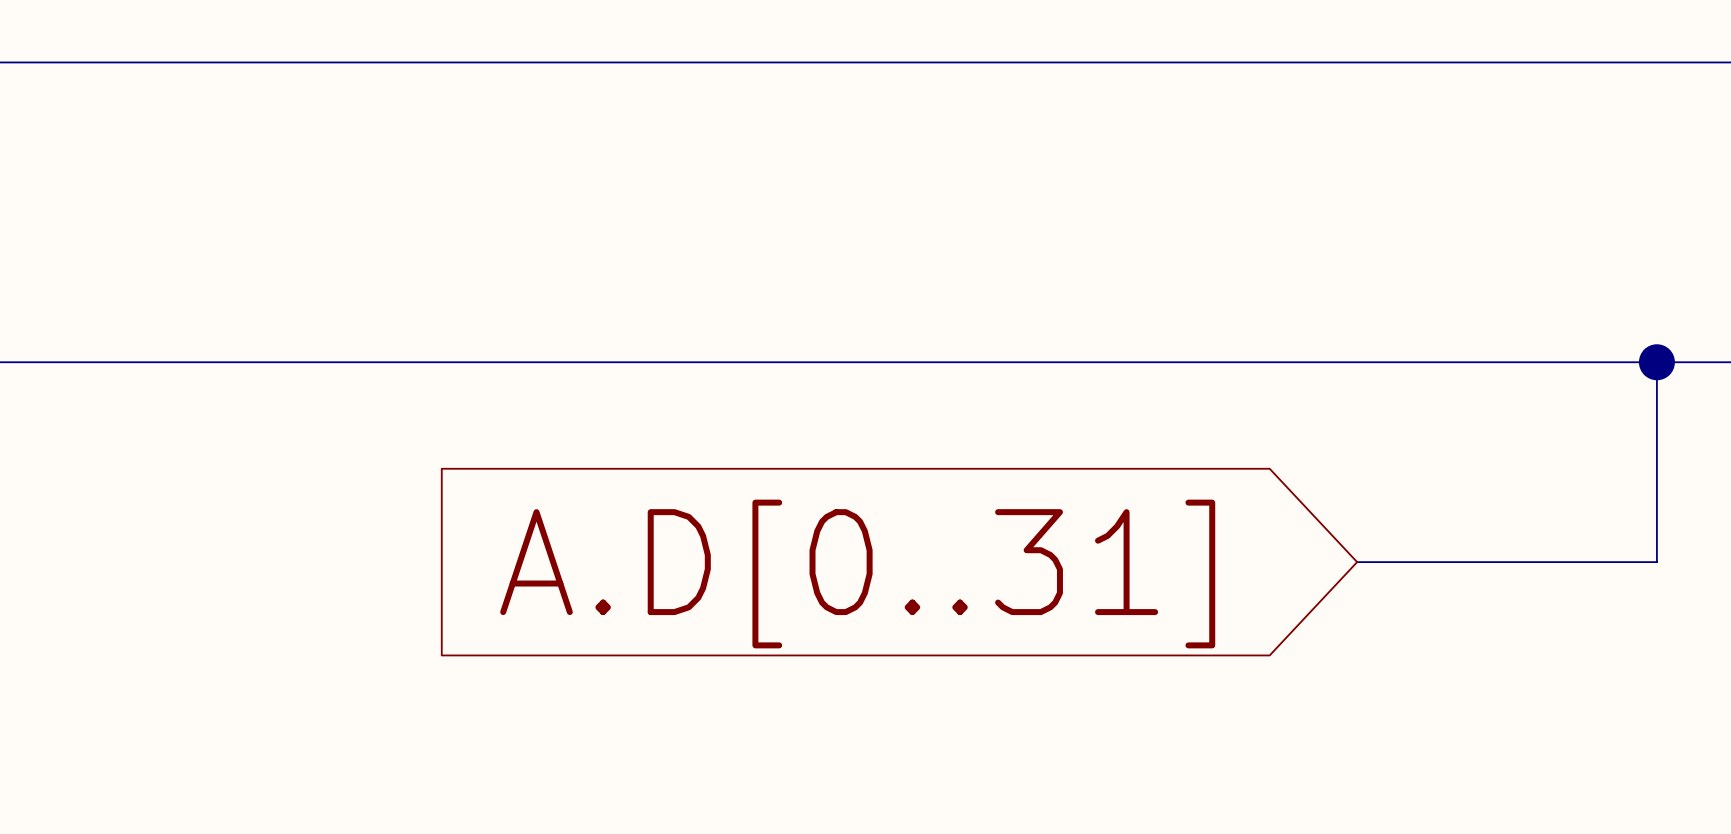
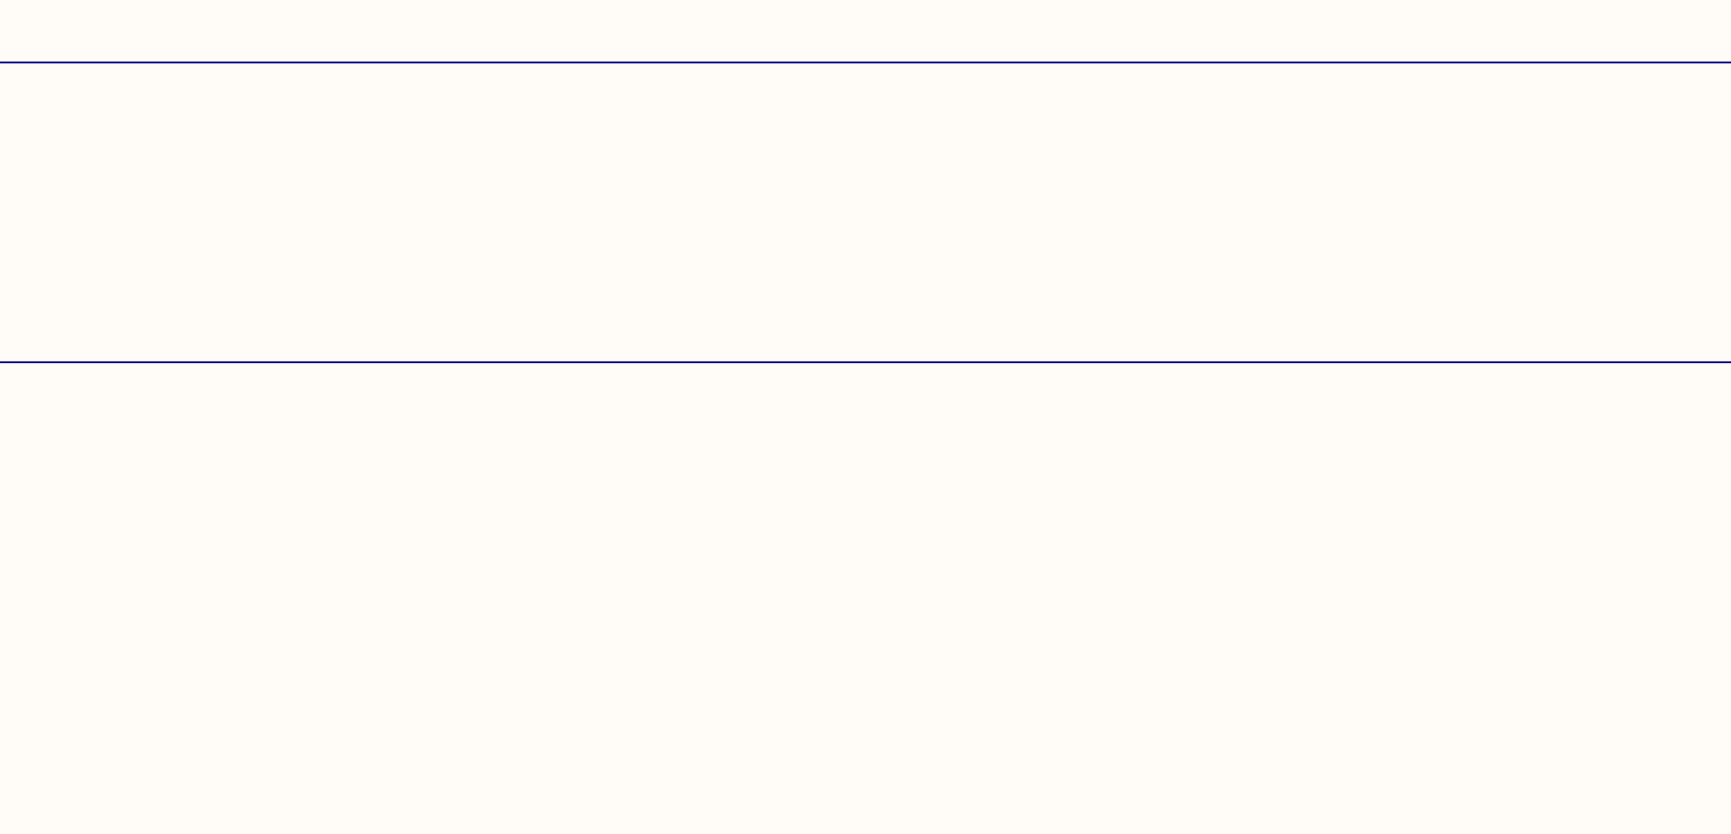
bus: (1656, 362) (1656, 562) (1357, 562) -> none
junction: (1656, 362) -> none
global label: A.D[0..31] (857, 574) -> none

